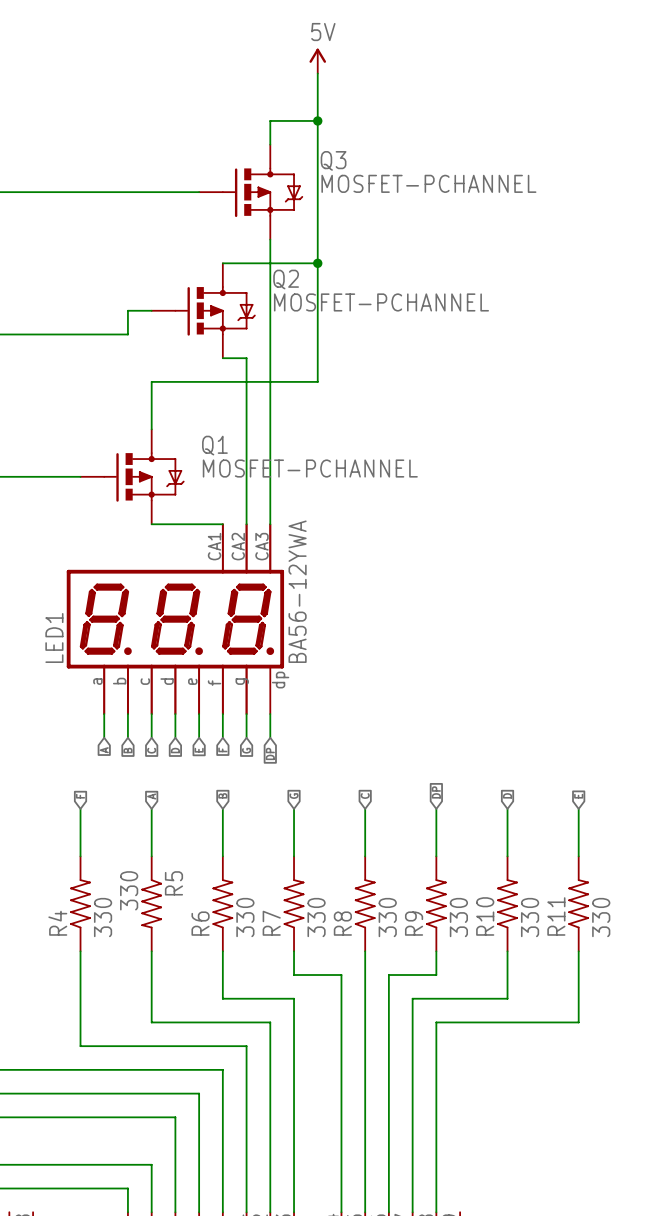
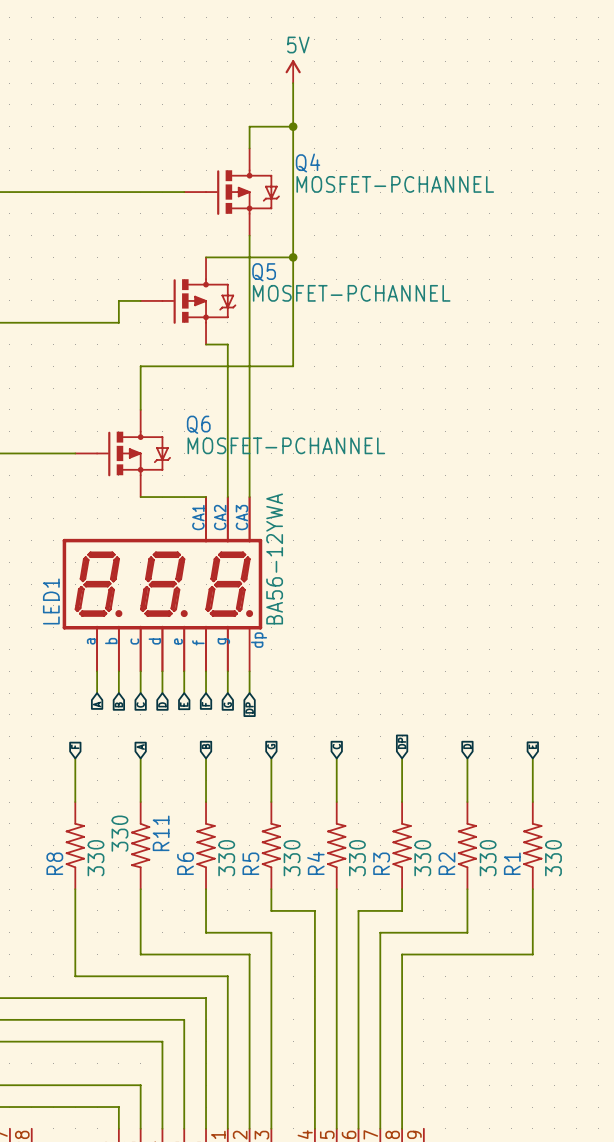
Q3 name: Q3 (333, 160) -> Q4 (308, 163)
Q2 name: Q2 (286, 279) -> Q5 (264, 272)
Q1 name: Q1 (214, 445) -> Q6 (198, 424)
R5 name: R5 (173, 883) -> R11 (161, 833)
R10 name: R10 (485, 916) -> R2 (446, 863)
R11 name: R11 (556, 916) -> R1 (512, 863)
R4 name: R4 (57, 923) -> R8 (54, 863)
R7 name: R7 (271, 923) -> R5 (250, 863)
R8 name: R8 (342, 923) -> R4 (315, 863)
R9 name: R9 (414, 923) -> R3 (381, 863)

